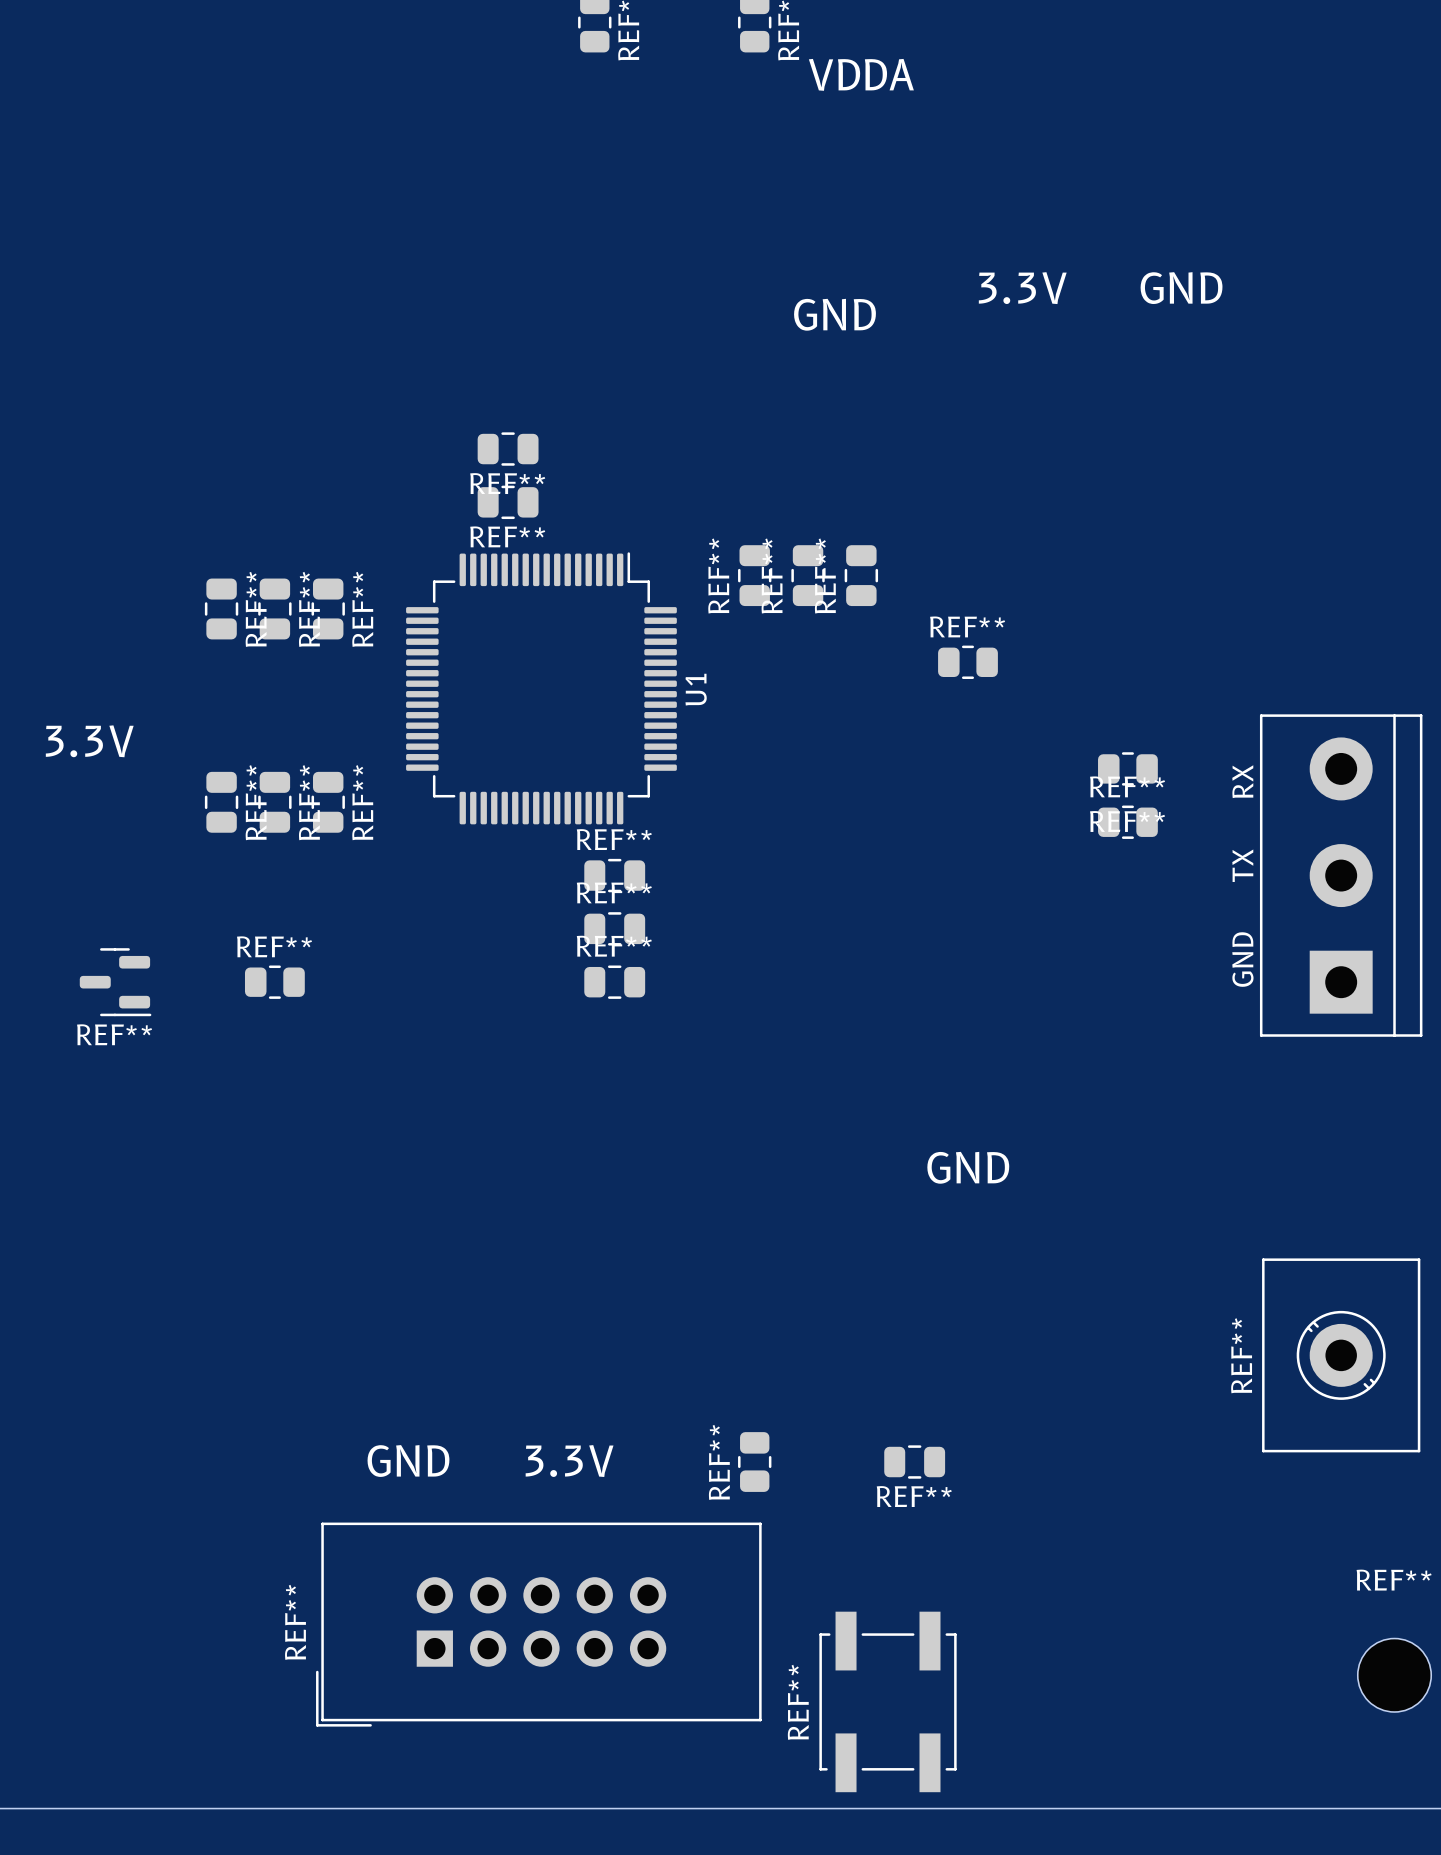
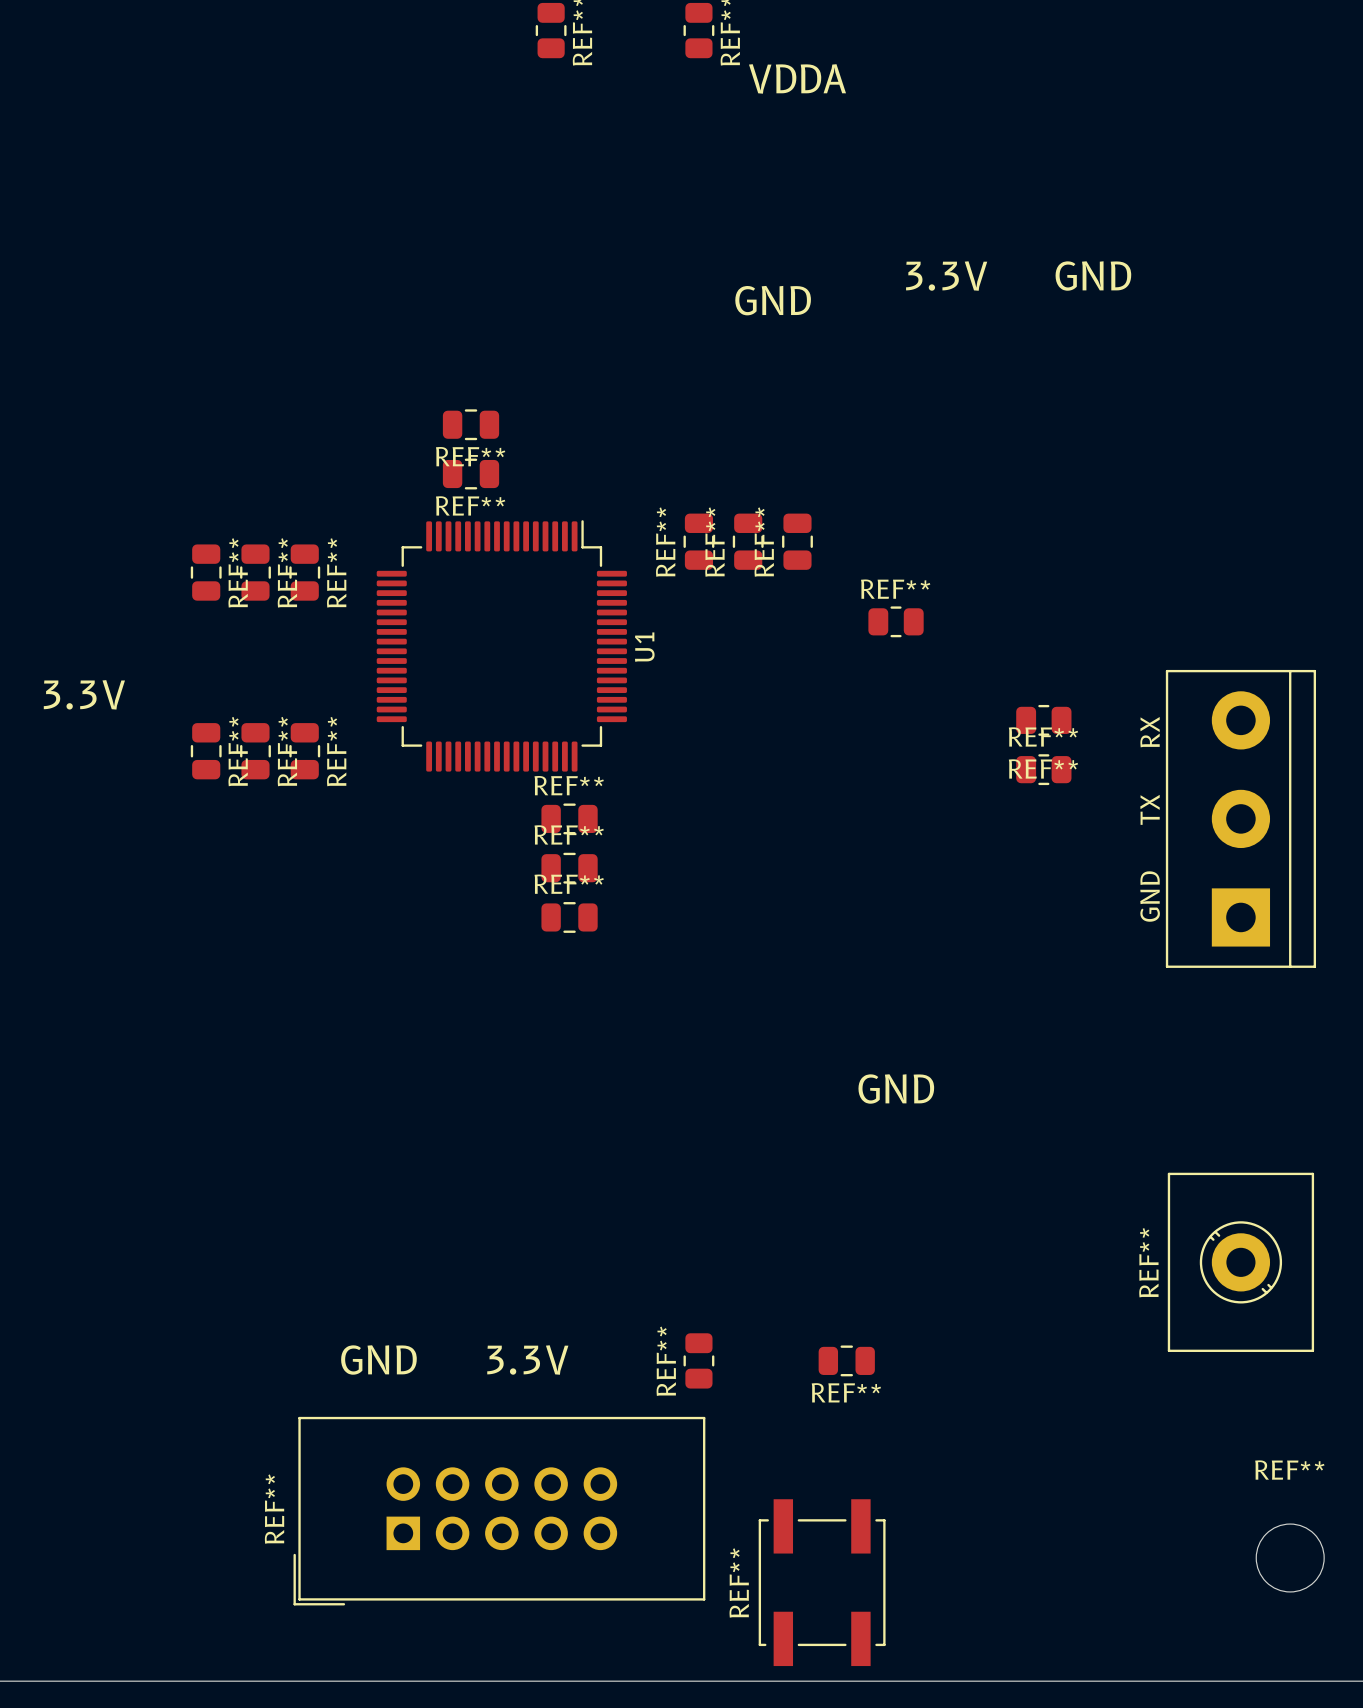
REF**: (115, 982) -> none
REF**: (274, 982) -> none

